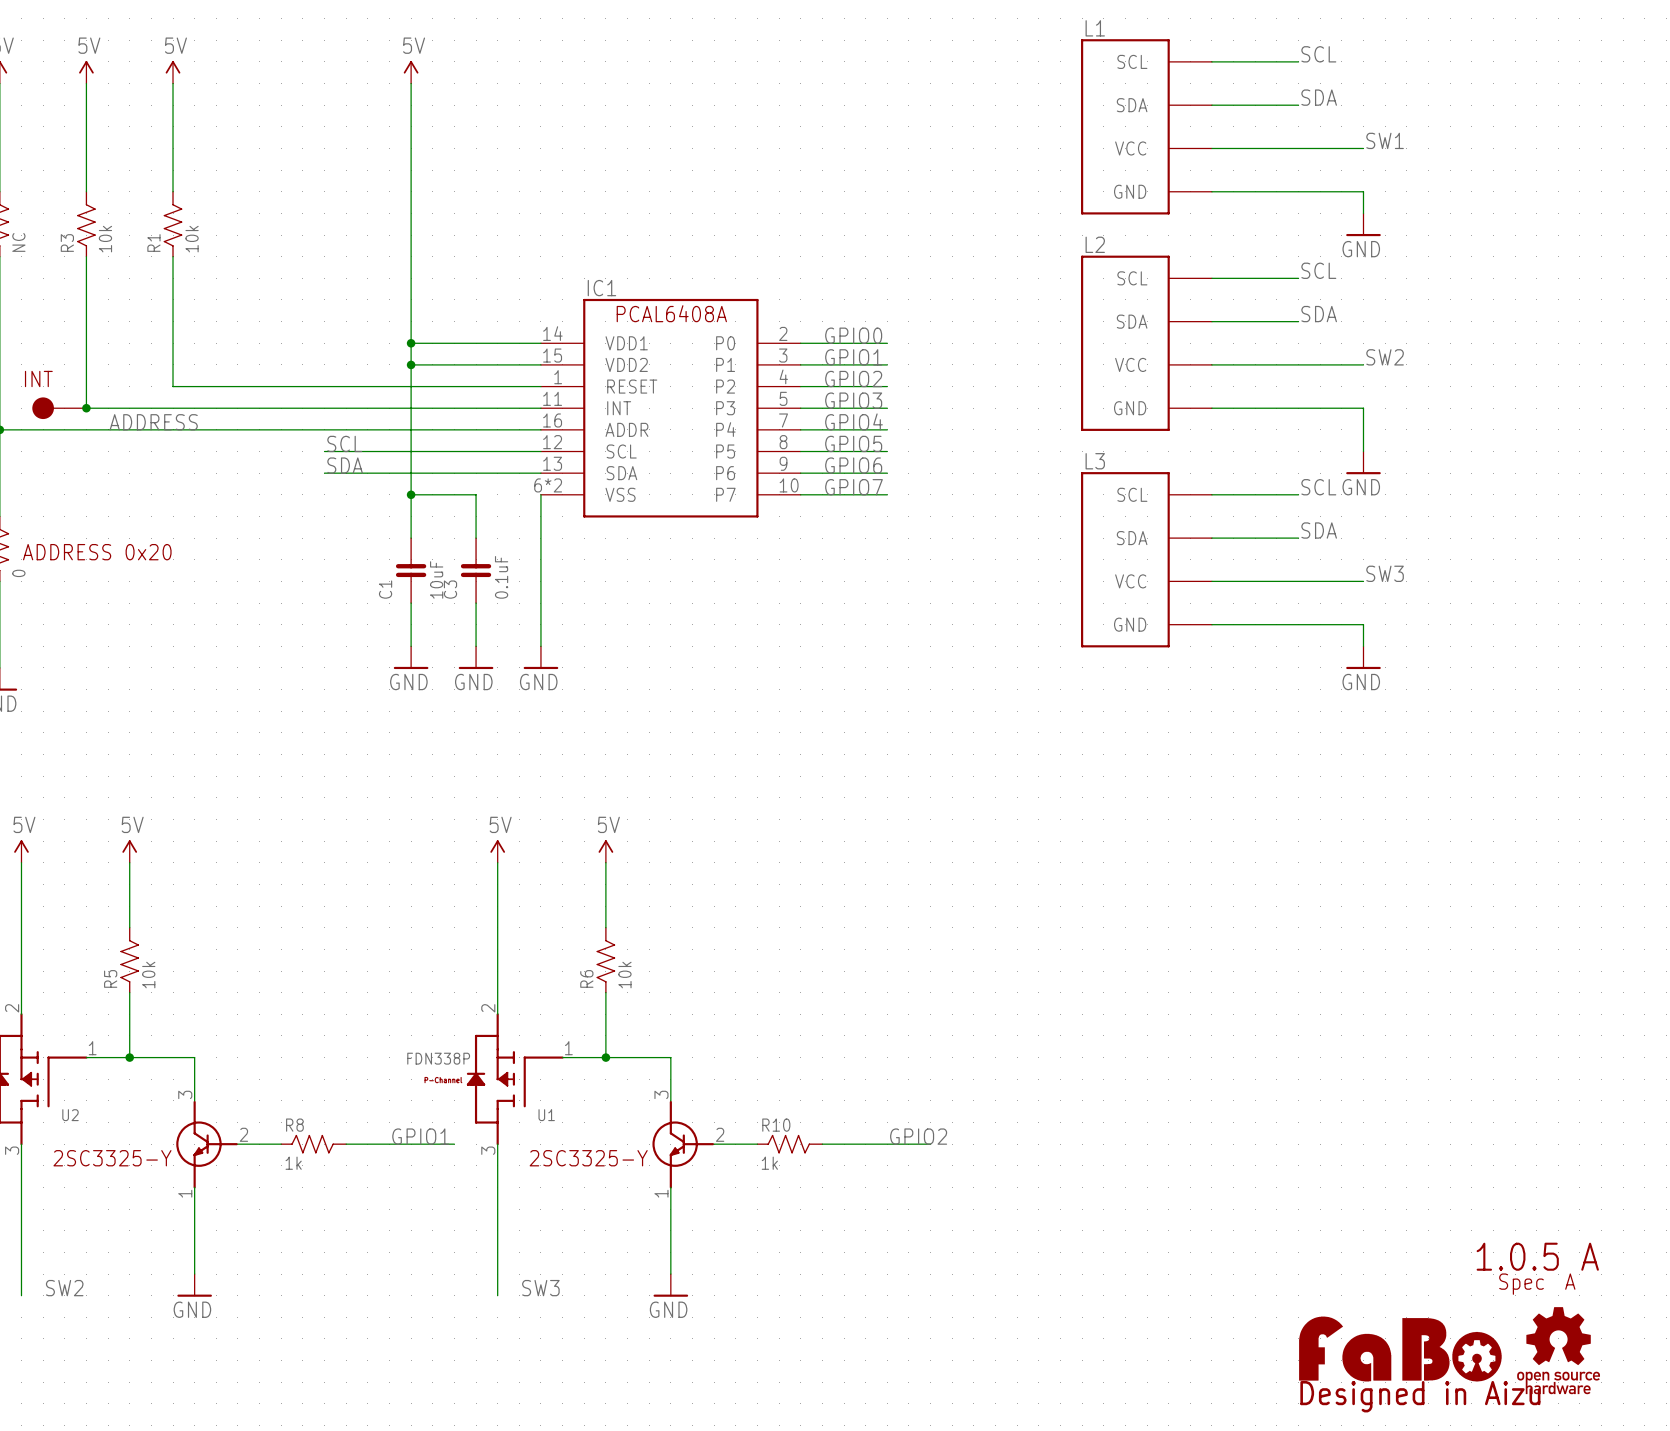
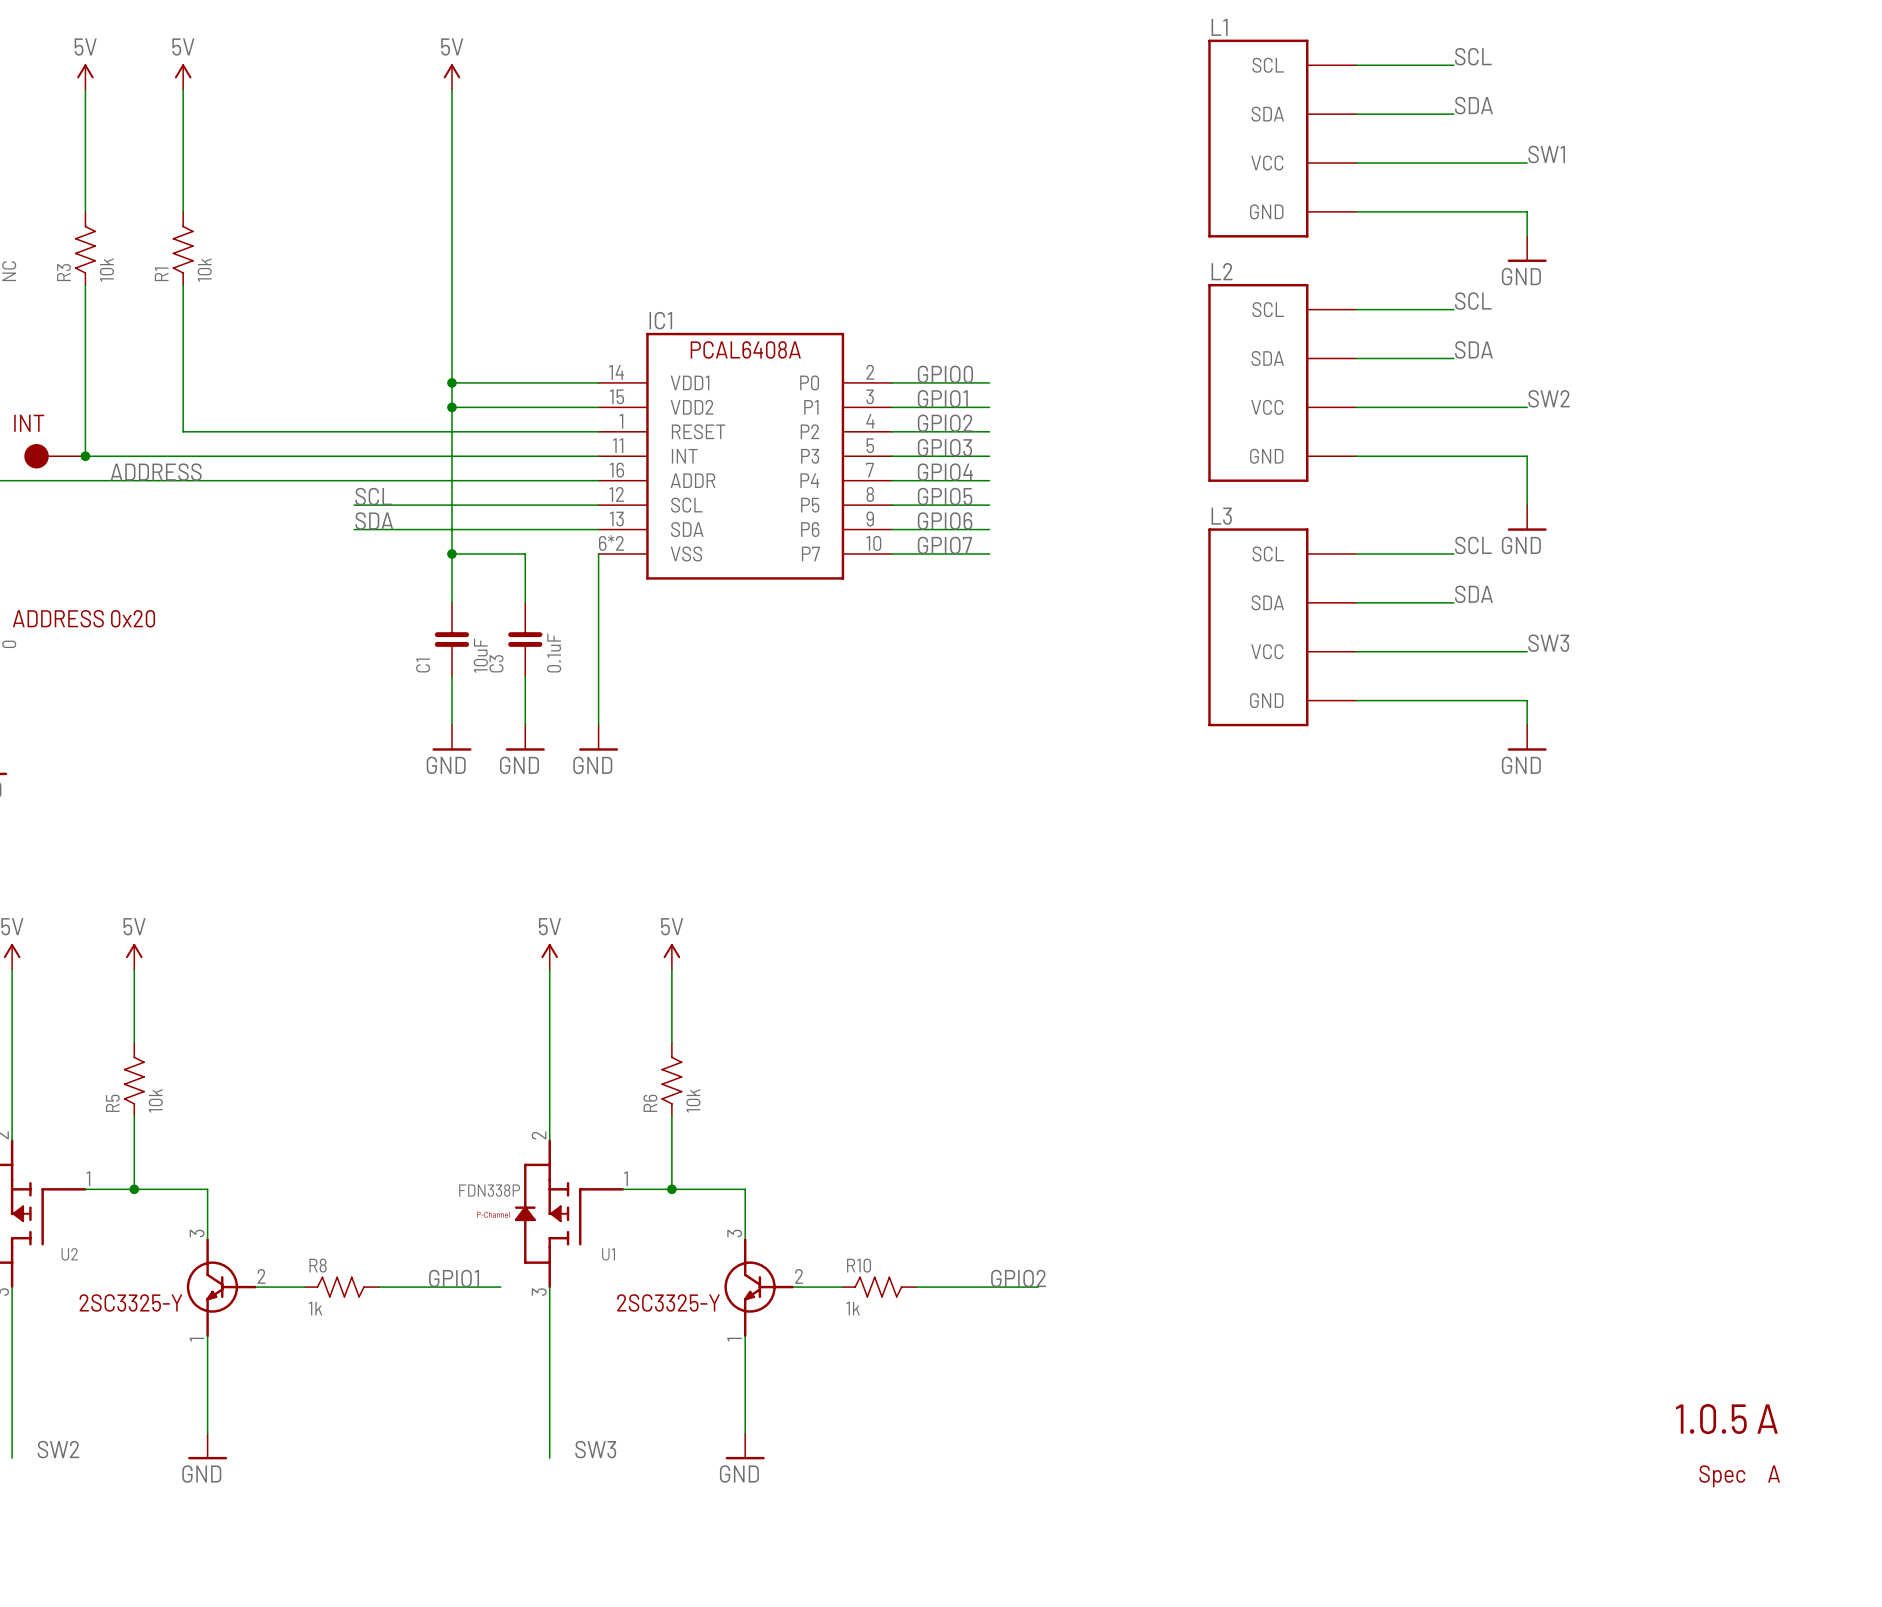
text position: 1.0.5 A (1537, 1256) -> 1.0.5 A (1726, 1419)
text position: Spec A (1537, 1284) -> Spec A (1739, 1476)
part: (1400, 1349) -> none
part: (1558, 1350) -> none

